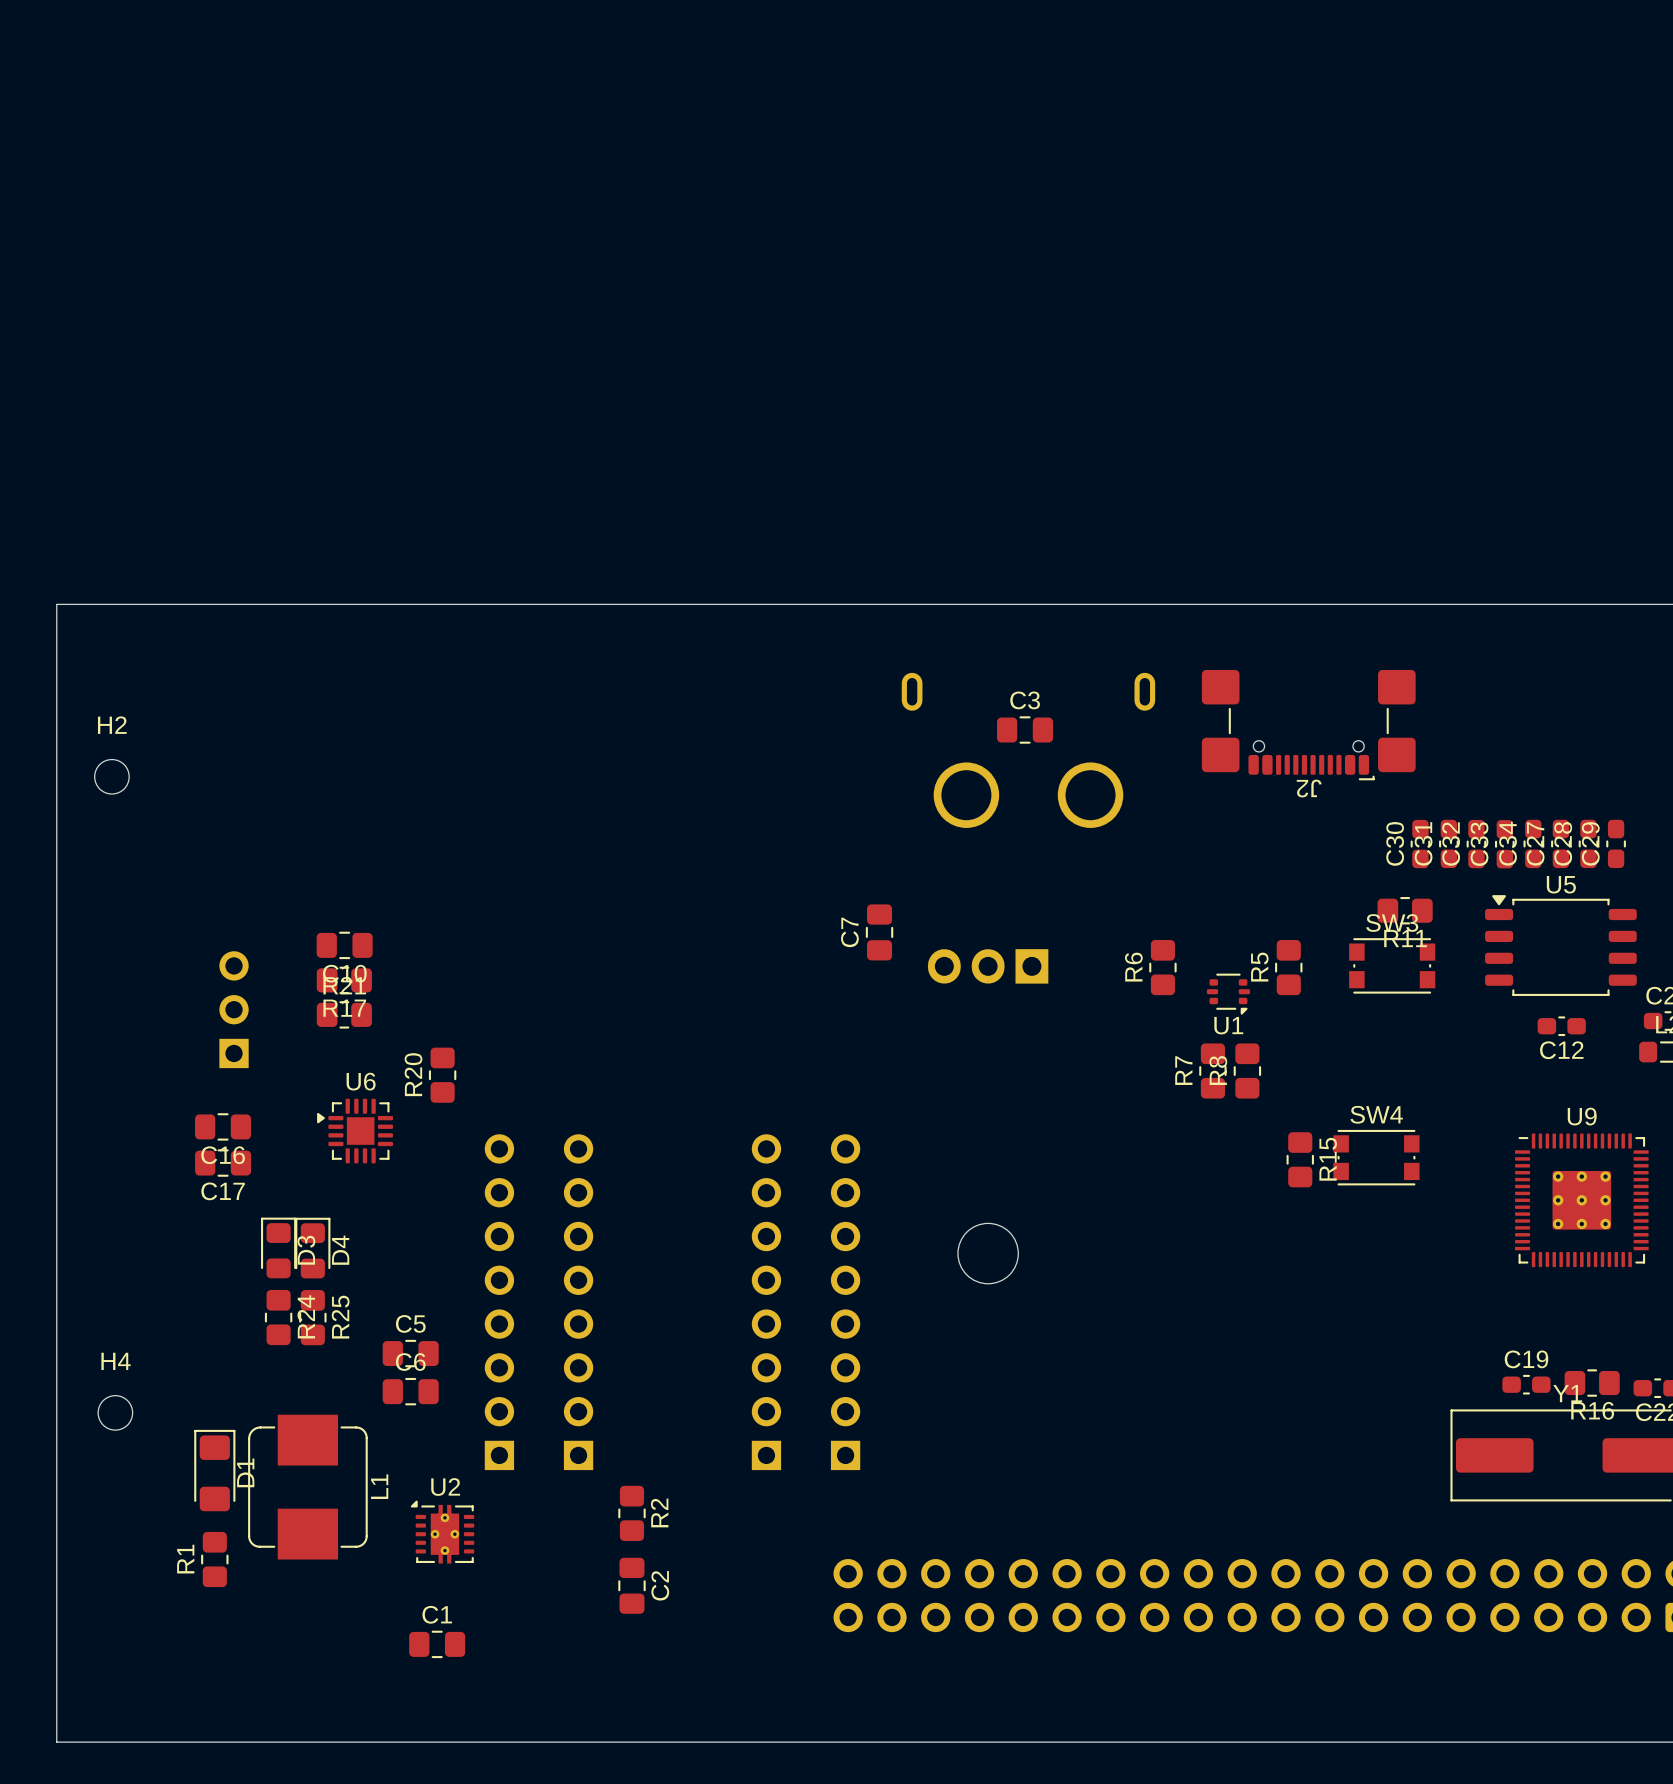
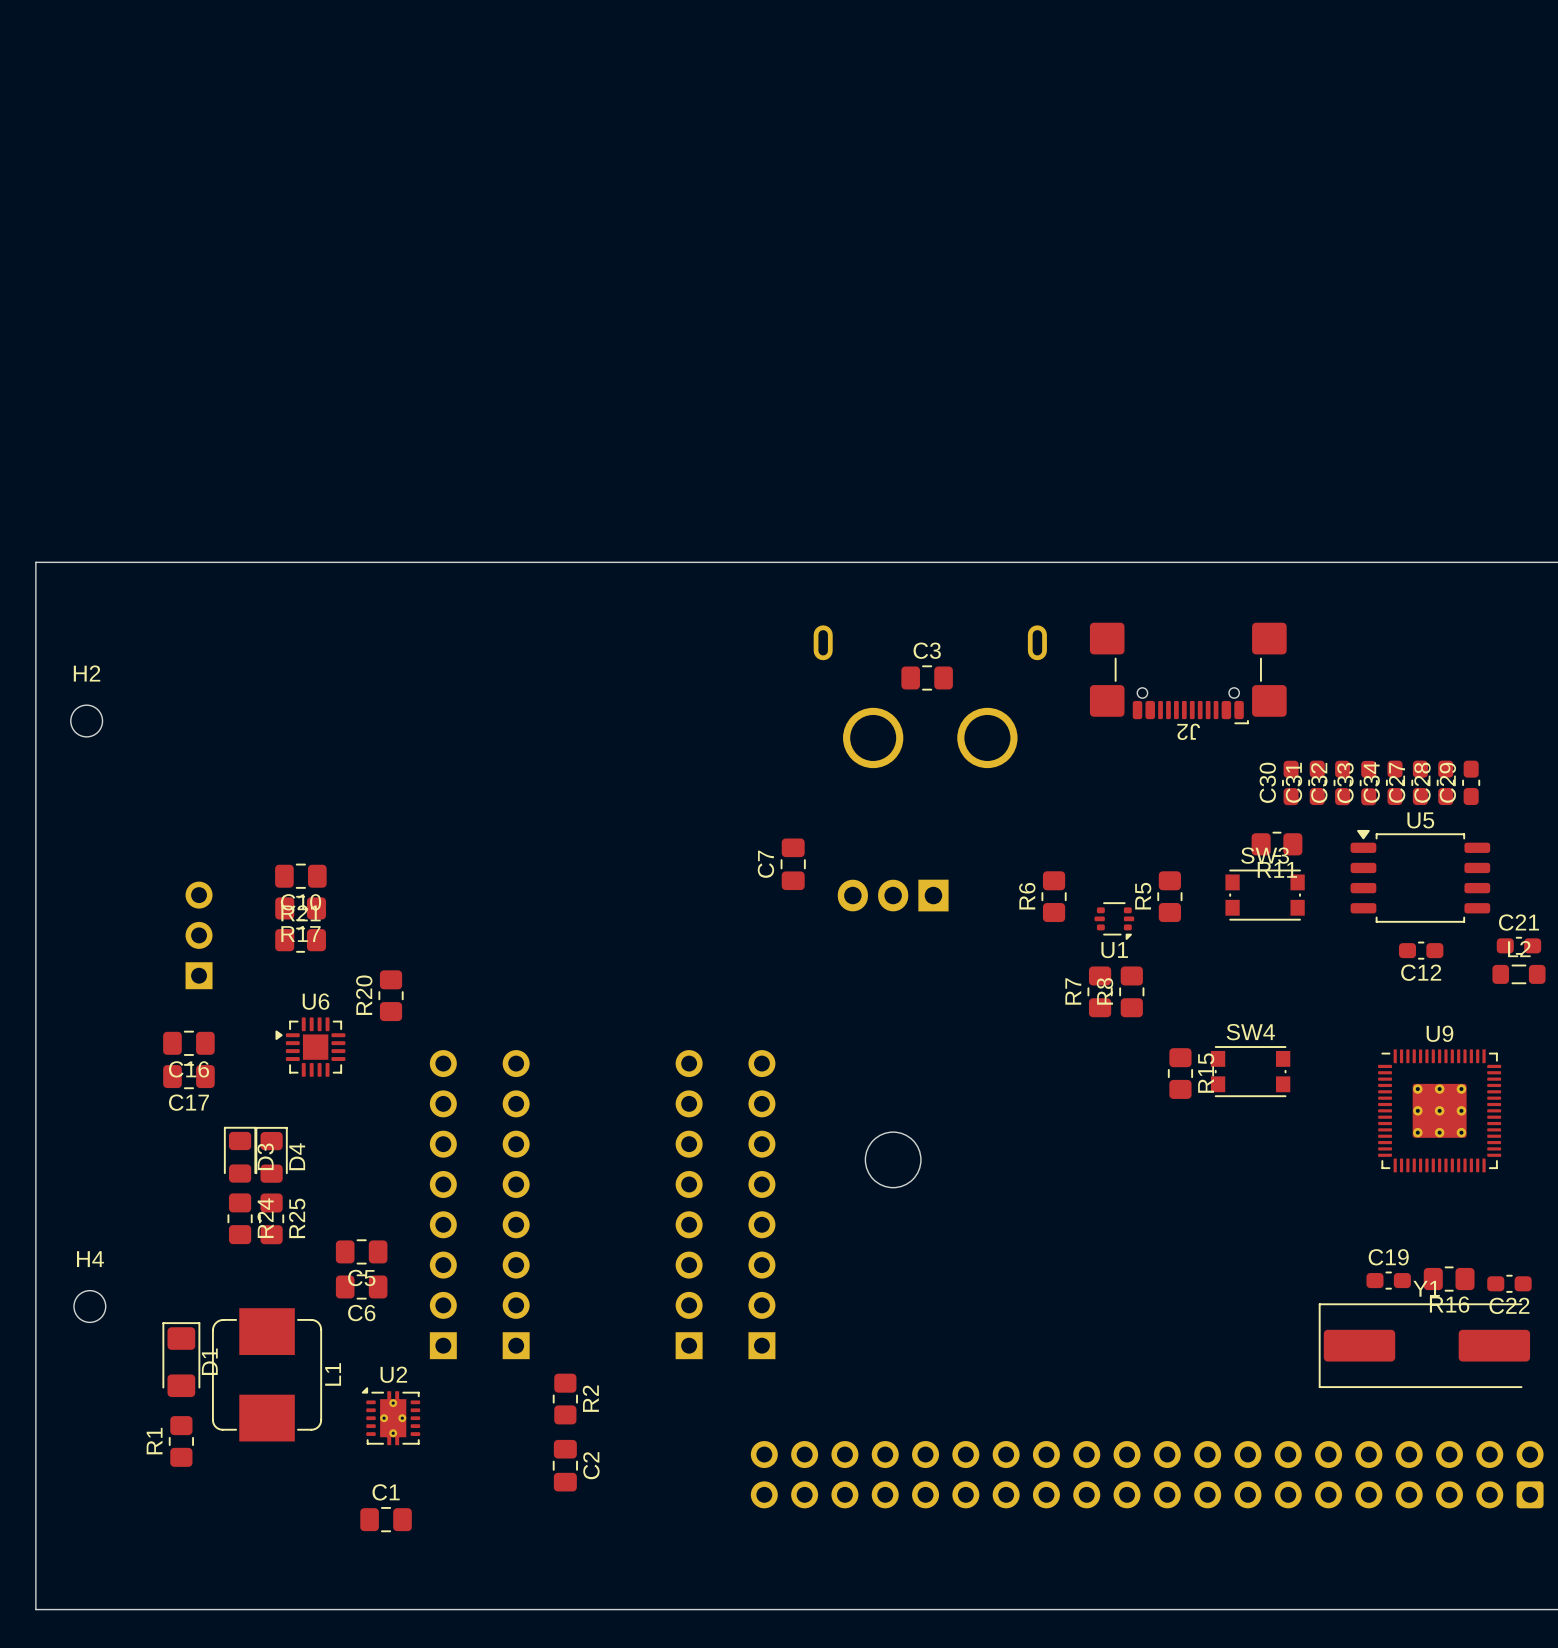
C5 name position: C5 (410, 1323) -> C5 (361, 1277)
C6 name position: C6 (410, 1362) -> C6 (361, 1313)

